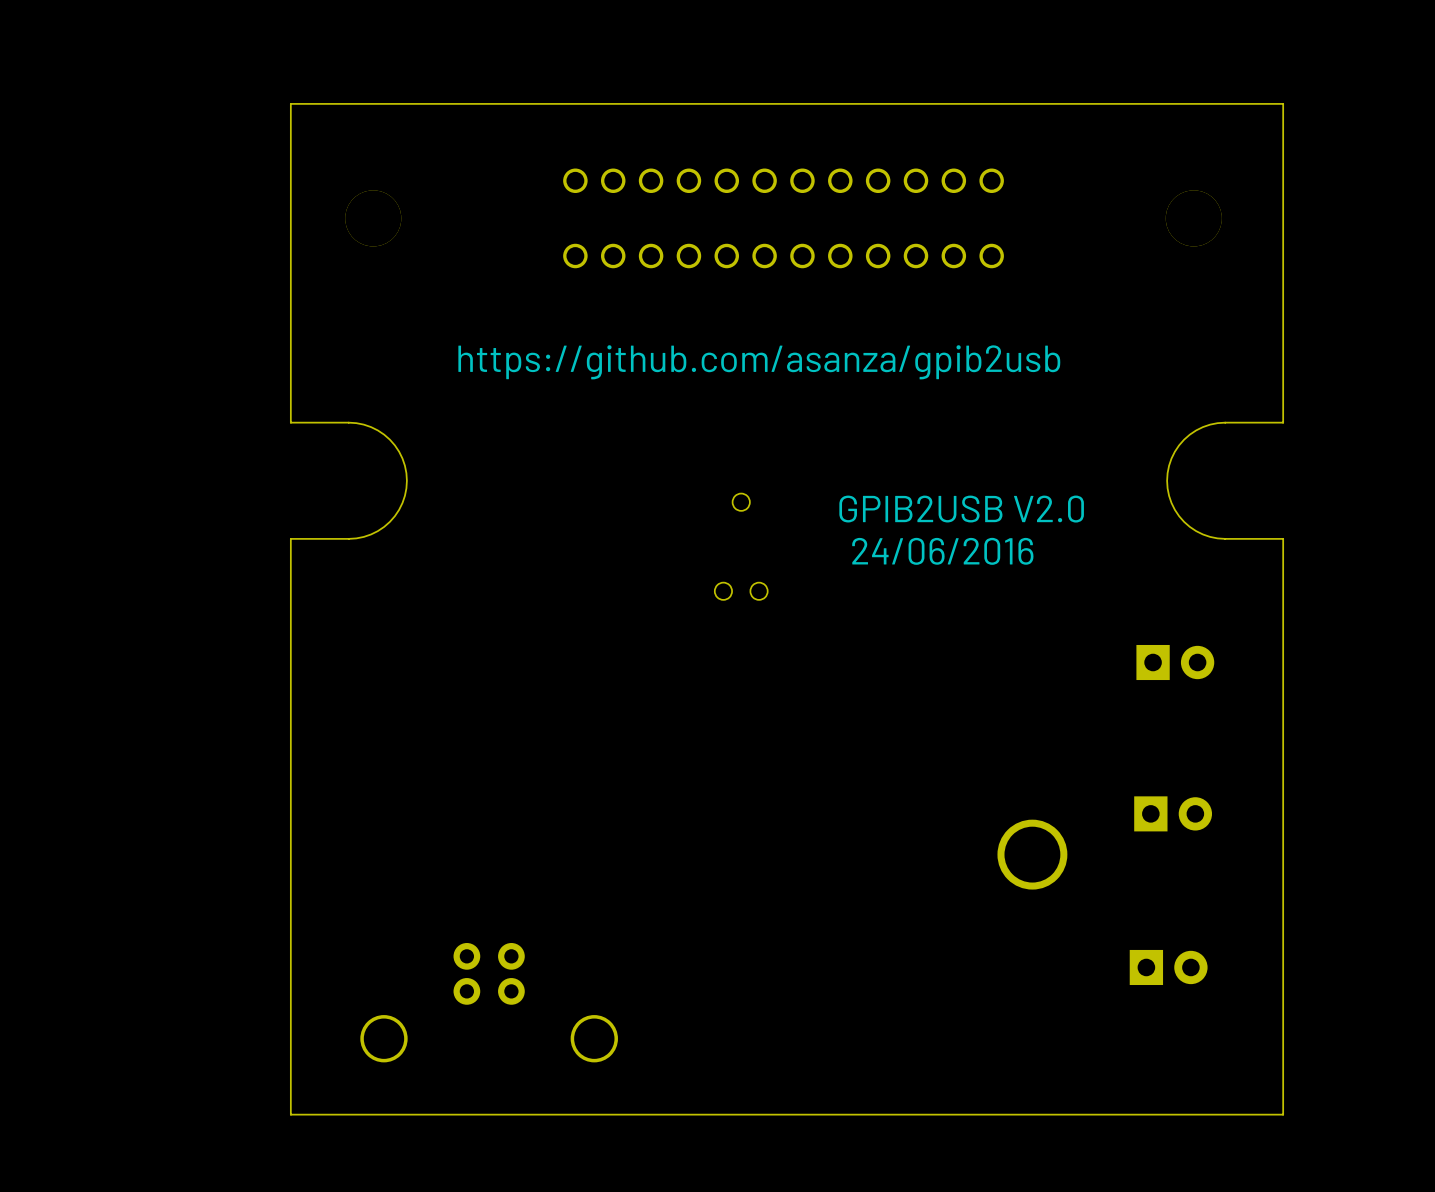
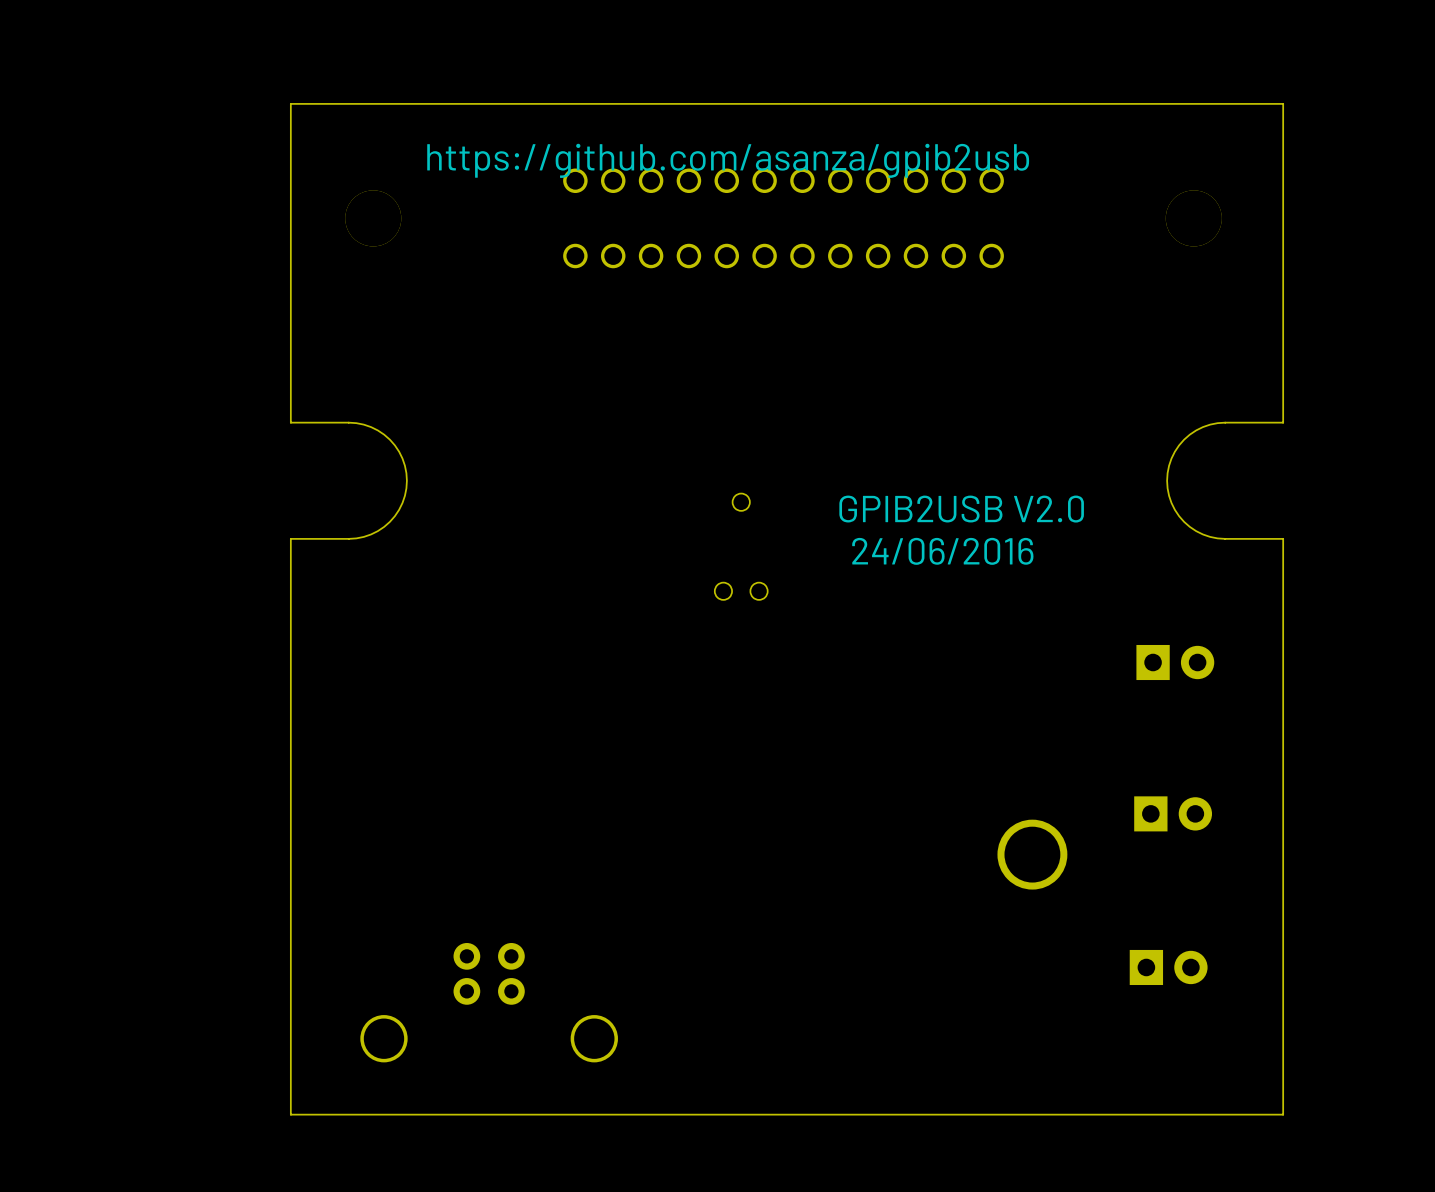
text position: https://github.com/asanza/gpib2usb (759, 362) -> https://github.com/asanza/gpib2usb (728, 160)

